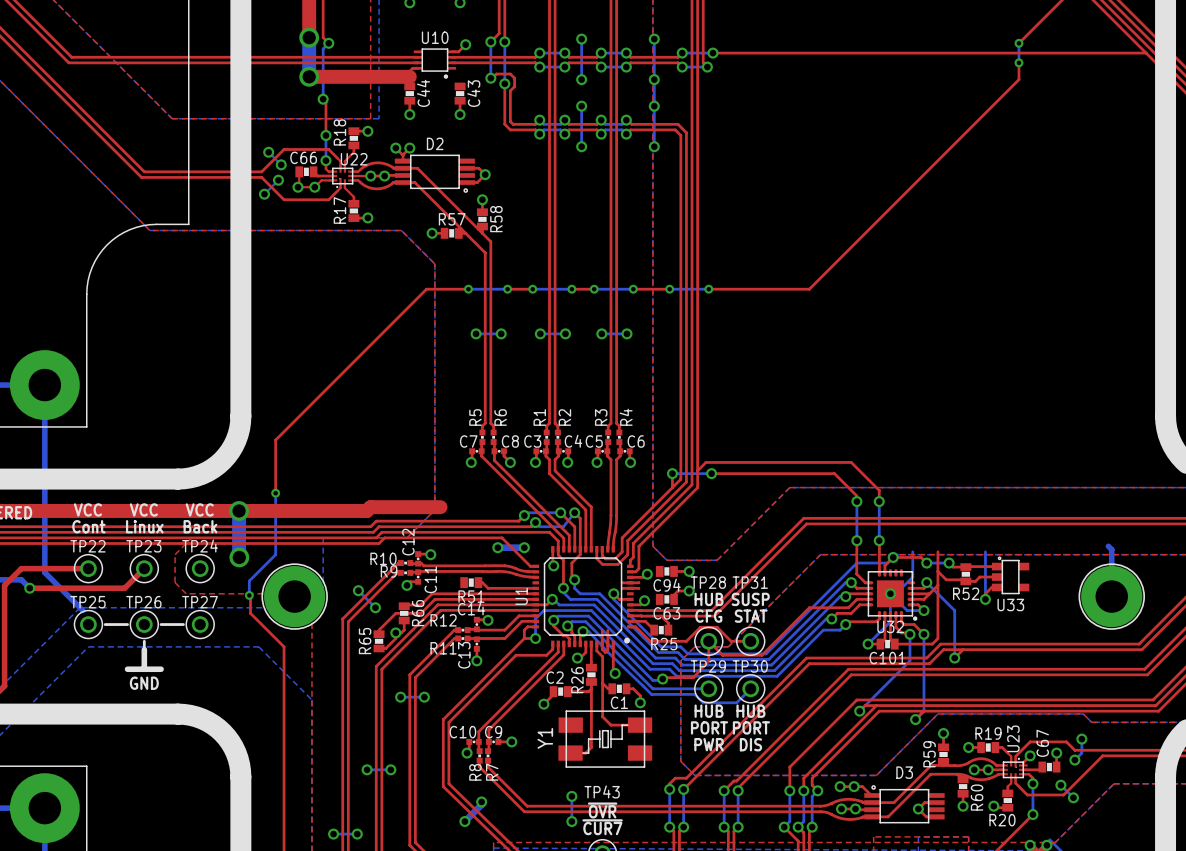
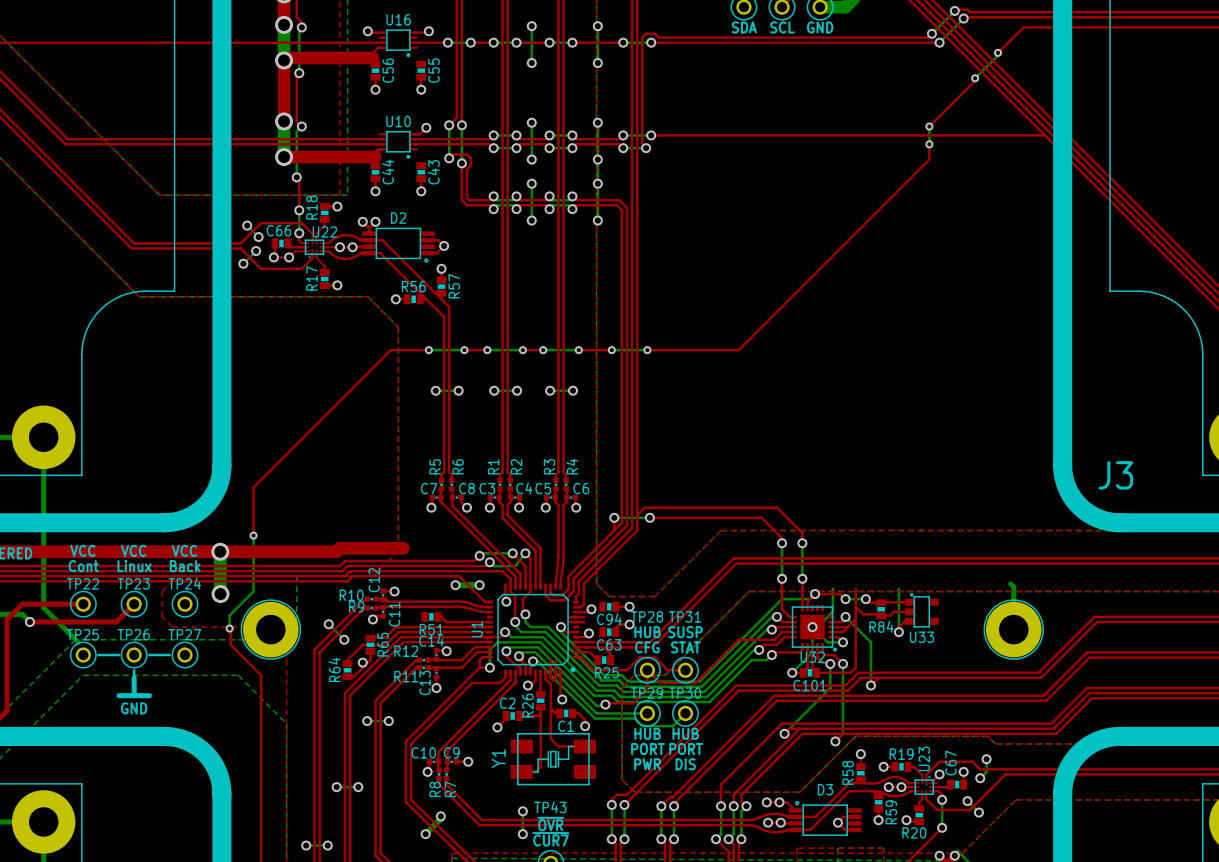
R57 name: R57 (452, 219) -> R56 (413, 286)
R58 name: R58 (496, 219) -> R57 (454, 286)
R52 name: R52 (966, 593) -> R84 (881, 626)
R66 name: R66 (418, 613) -> R65 (383, 644)
R65 name: R65 (365, 641) -> R64 (334, 669)
R59 name: R59 (929, 754) -> R58 (848, 772)
R60 name: R60 (977, 797) -> R59 (891, 812)

